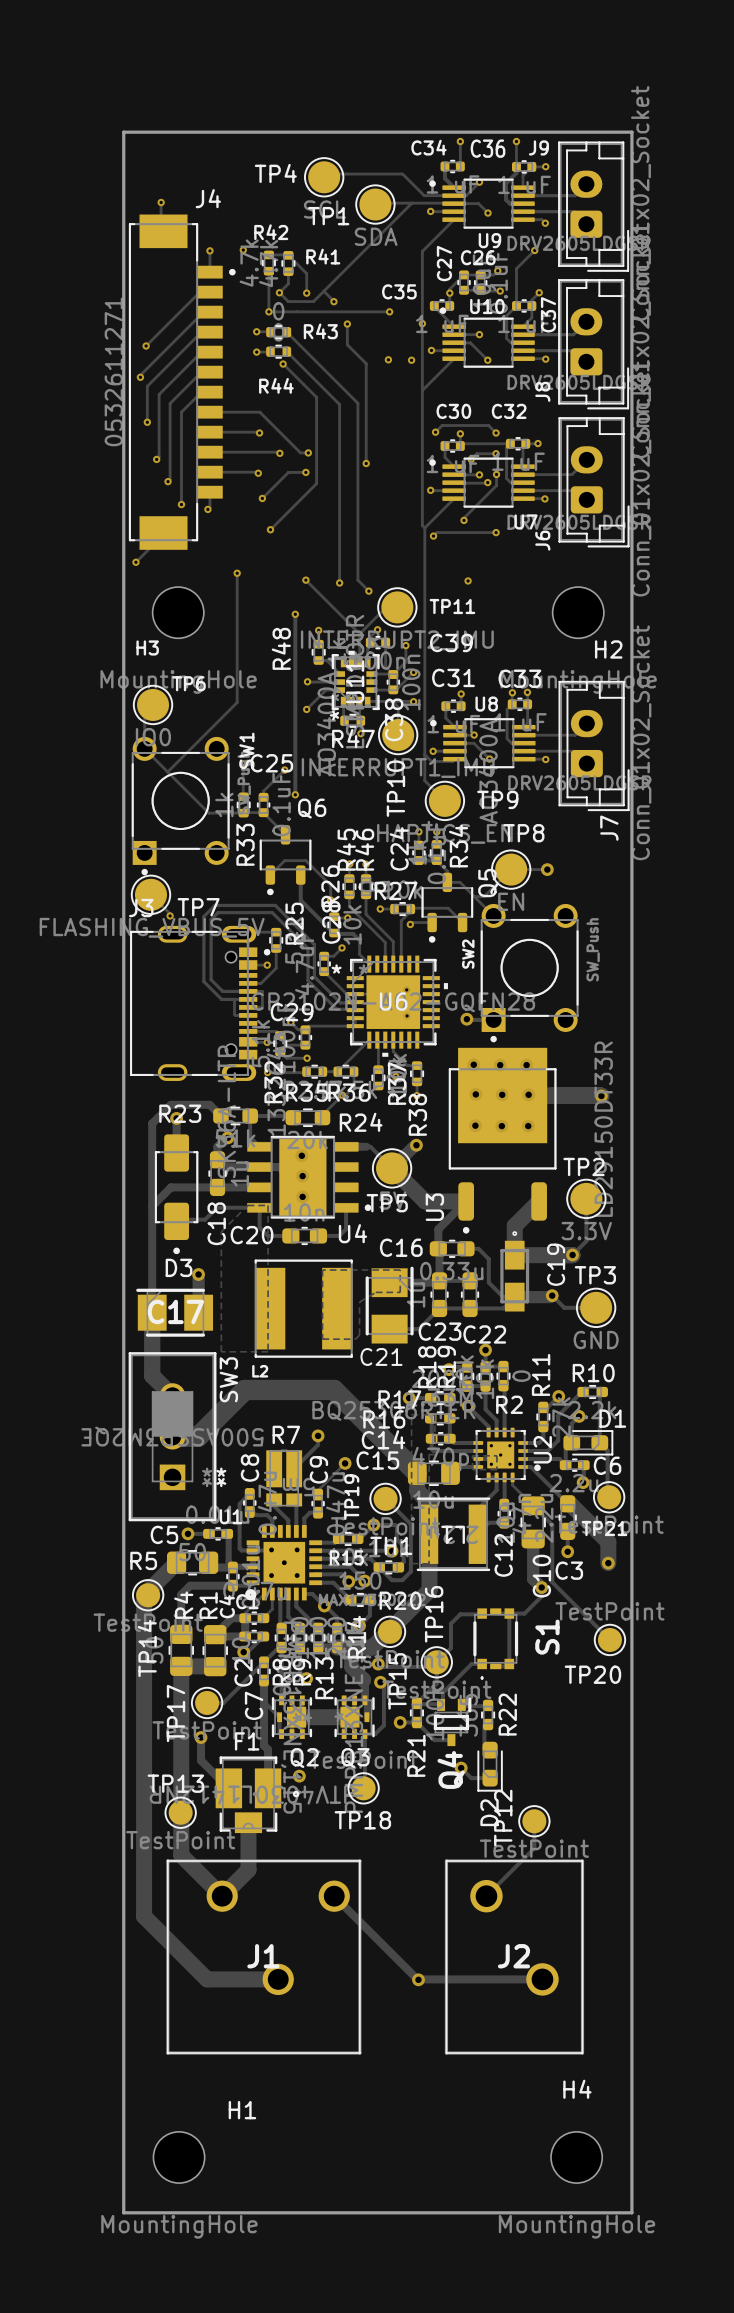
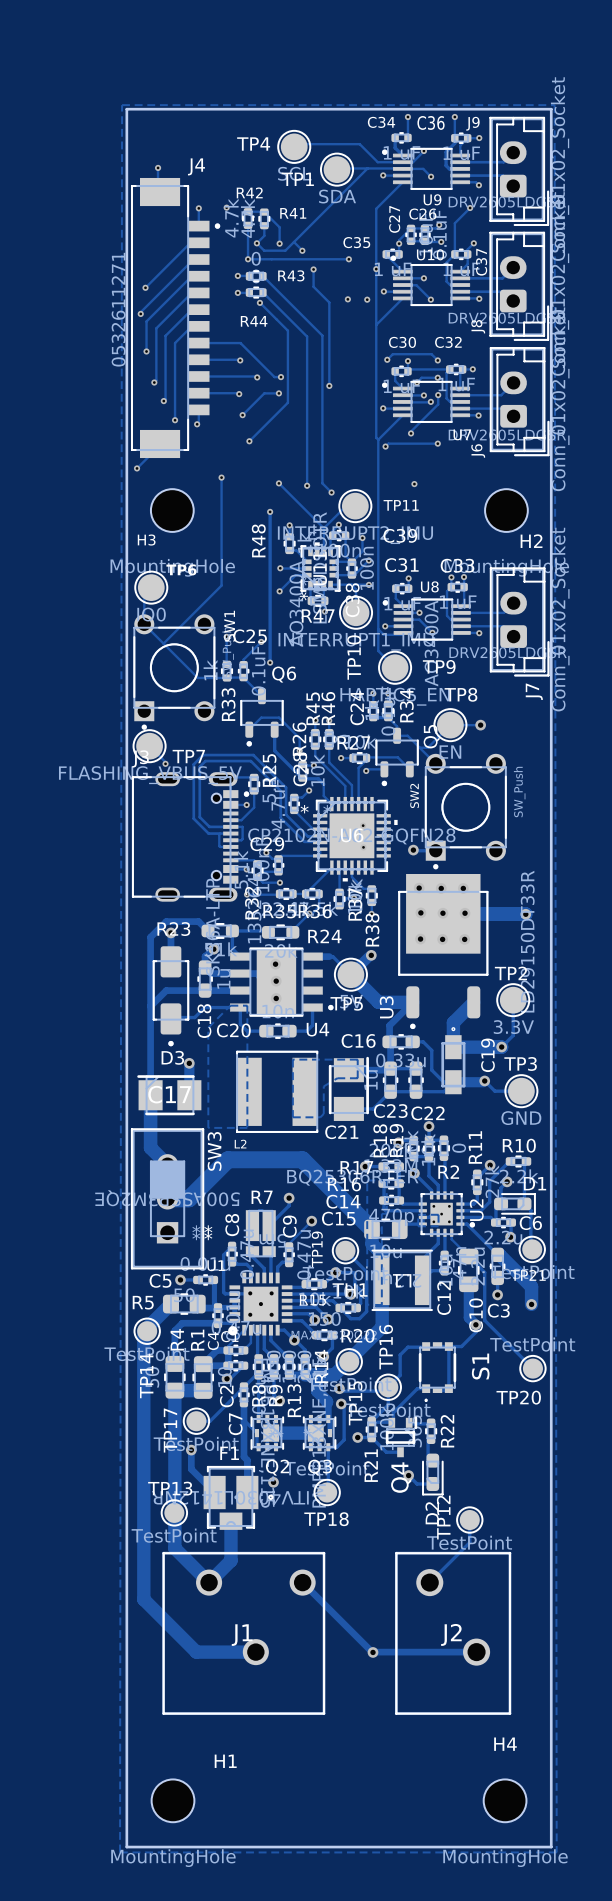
zone outline: none -> (122, 105) (120, 1852) (556, 1852) (554, 105) (122, 105)

